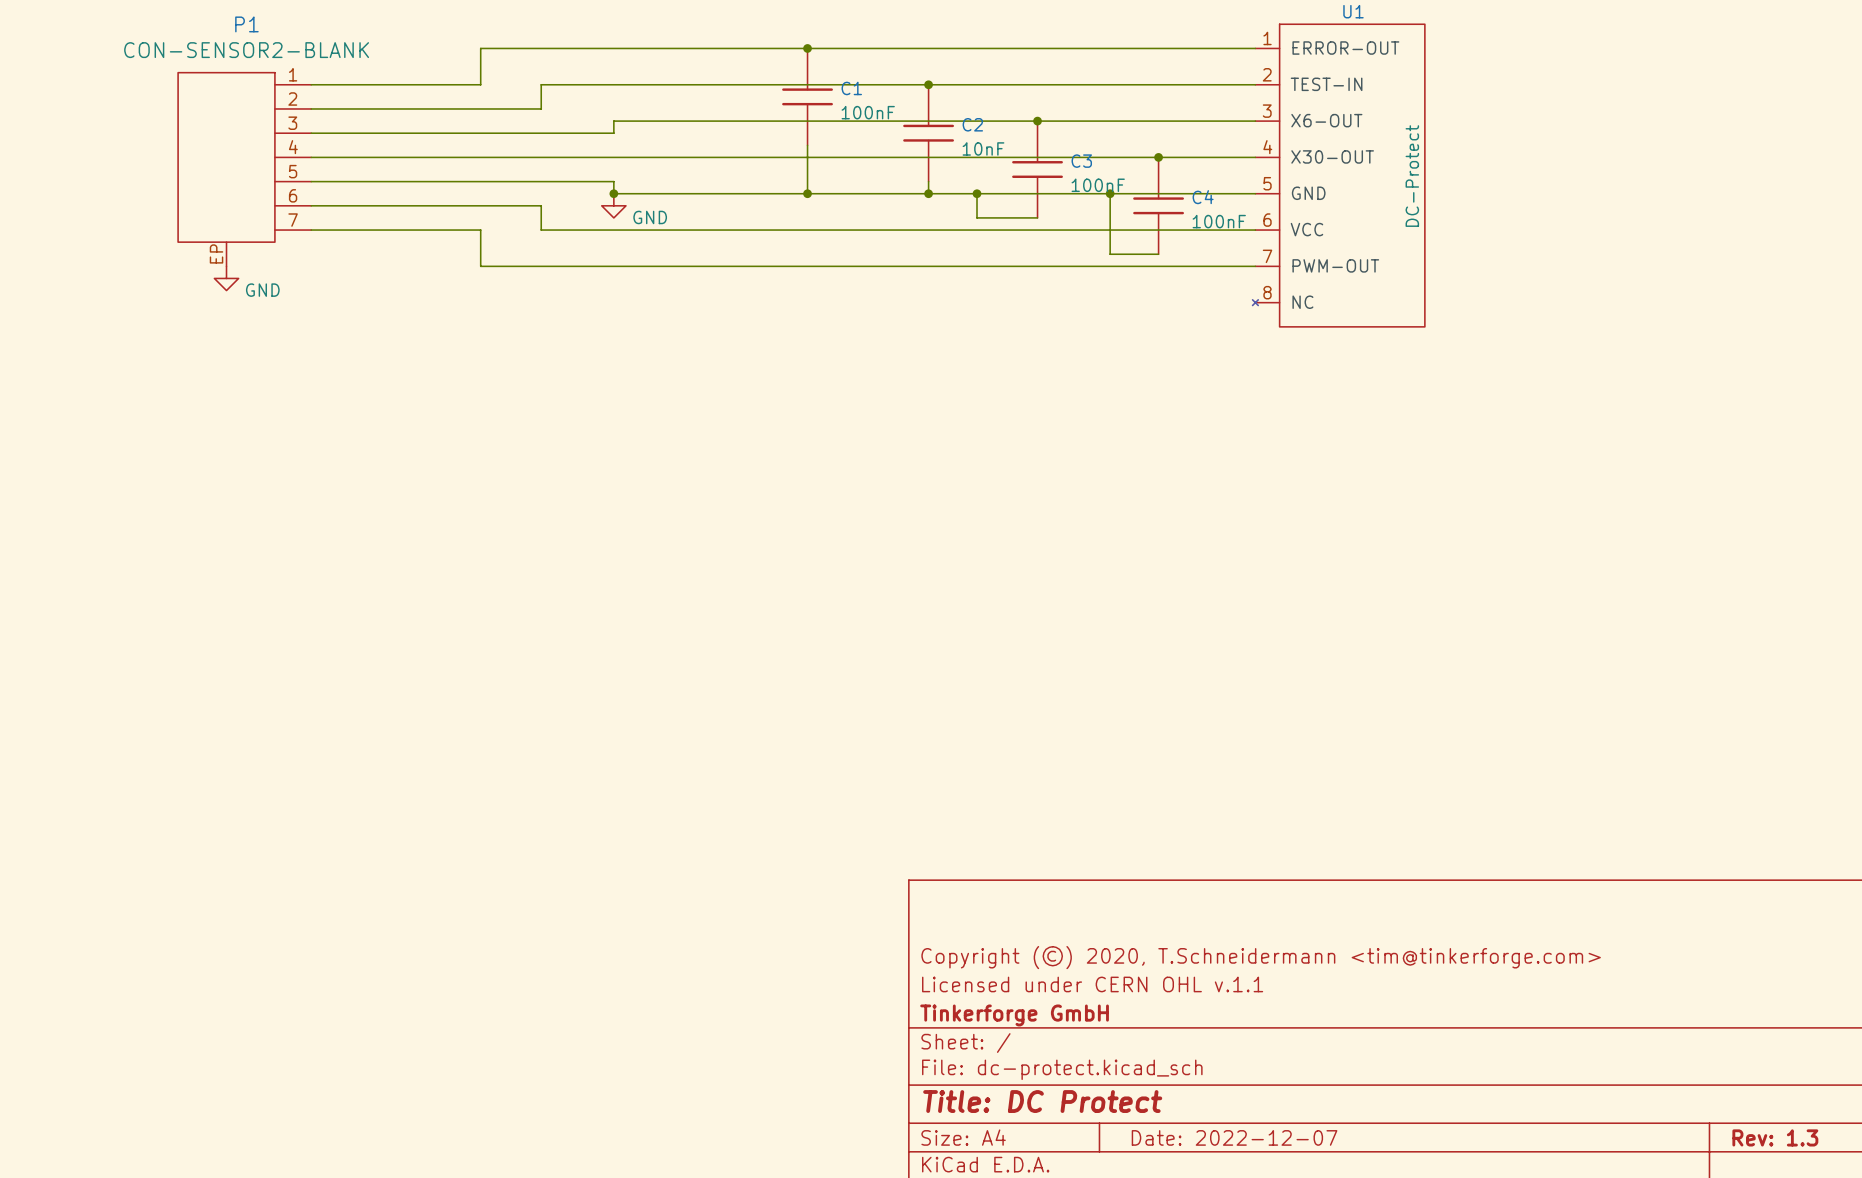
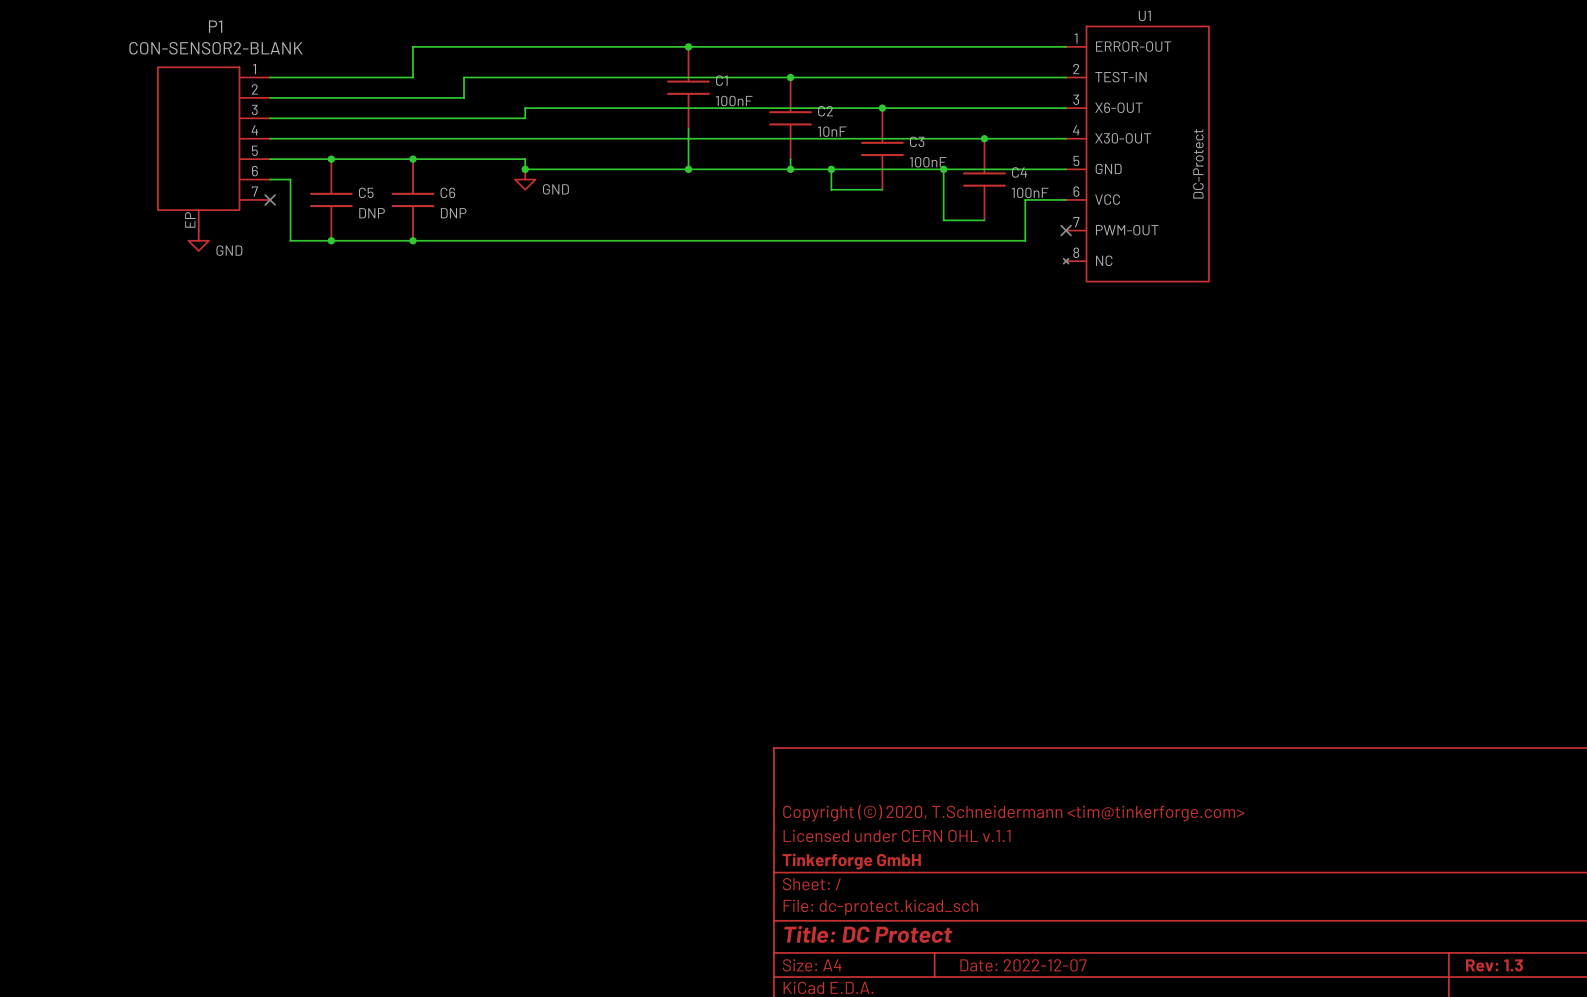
junction: none -> (331, 159)
junction: none -> (413, 159)
wire: (335, 205) (541, 205) (541, 230) (1206, 230) -> (290, 179) (290, 240) (1025, 240) (1025, 199)
wire: (311, 230) (480, 230) (480, 266) (1255, 266) -> none
no-connect mark: none -> (270, 199)
C5: none -> DNP (331, 199)
C6: none -> DNP (413, 199)
no-connect mark: none -> (1066, 230)
junction: none -> (331, 240)
junction: none -> (413, 240)

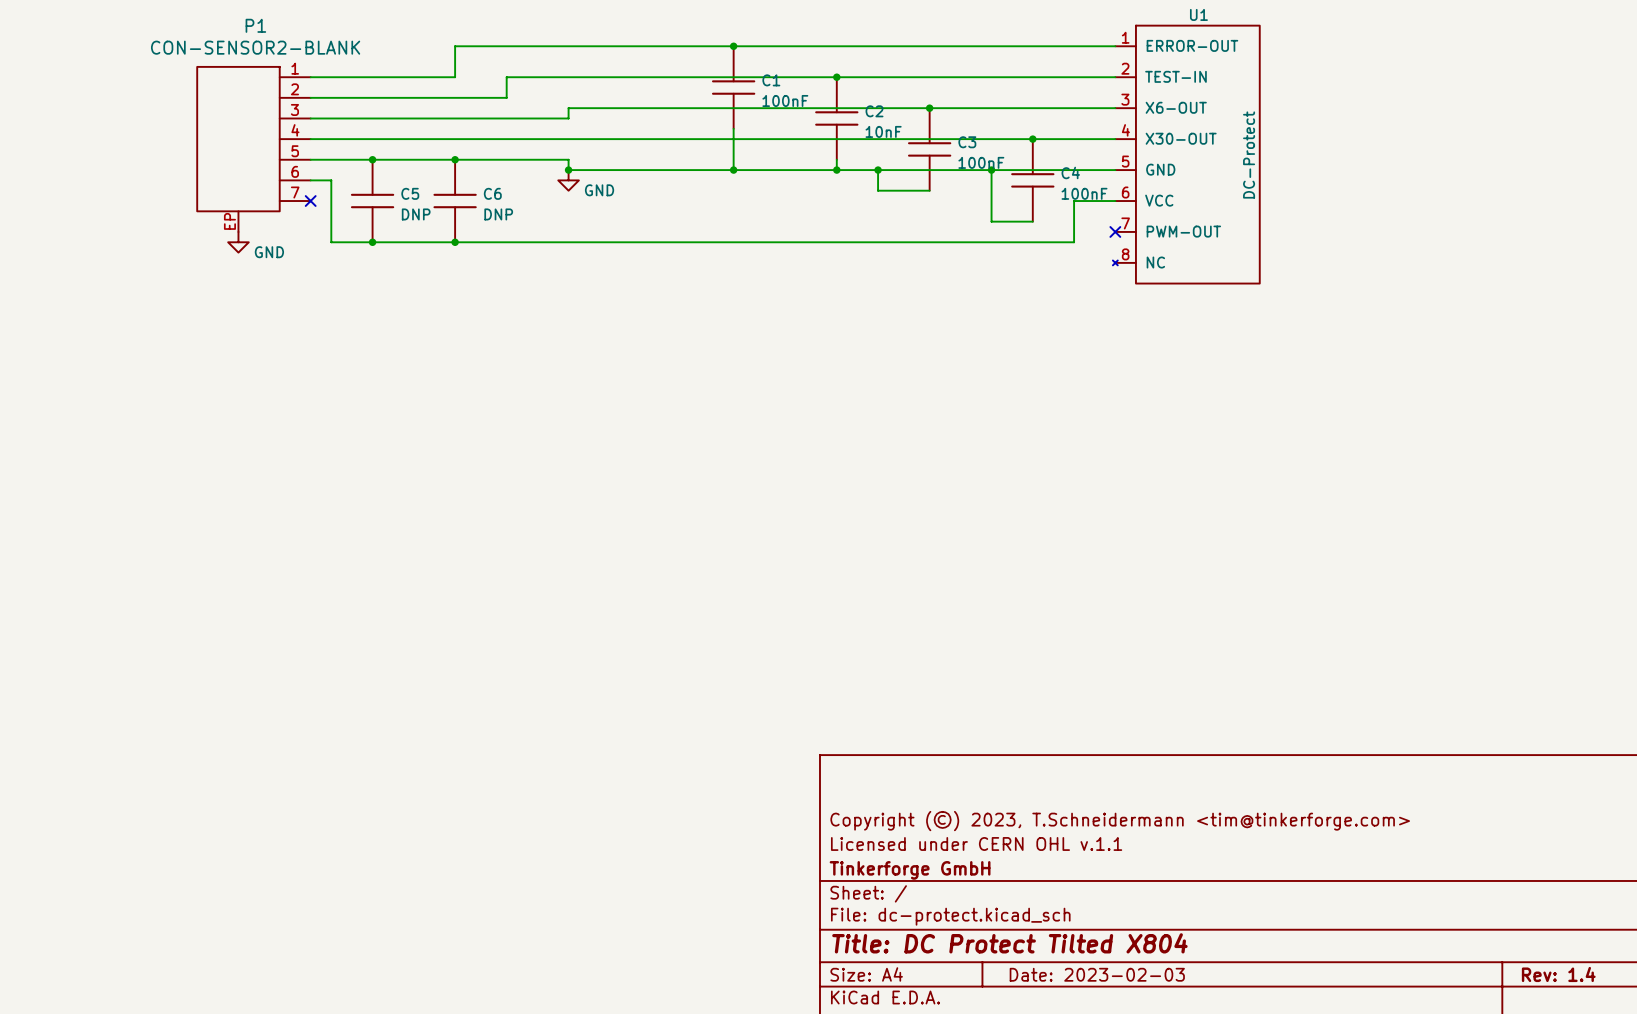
title block: Copyright (©) 2020, T.Schneidermann <tim@tinkerforge.com> (1013, 813) -> Copyright (©) 2023, T.Schneidermann <tim@tinkerforge.com> (1120, 821)
title block: Title: DC Protect (868, 934) -> Title: DC Protect Tilted X804 (1009, 943)
title block: Date: 2022-12-07 (1023, 965) -> Date: 2023-02-03 (1097, 974)
title block: Rev: 1.3 (1494, 965) -> Rev: 1.4 (1558, 974)

